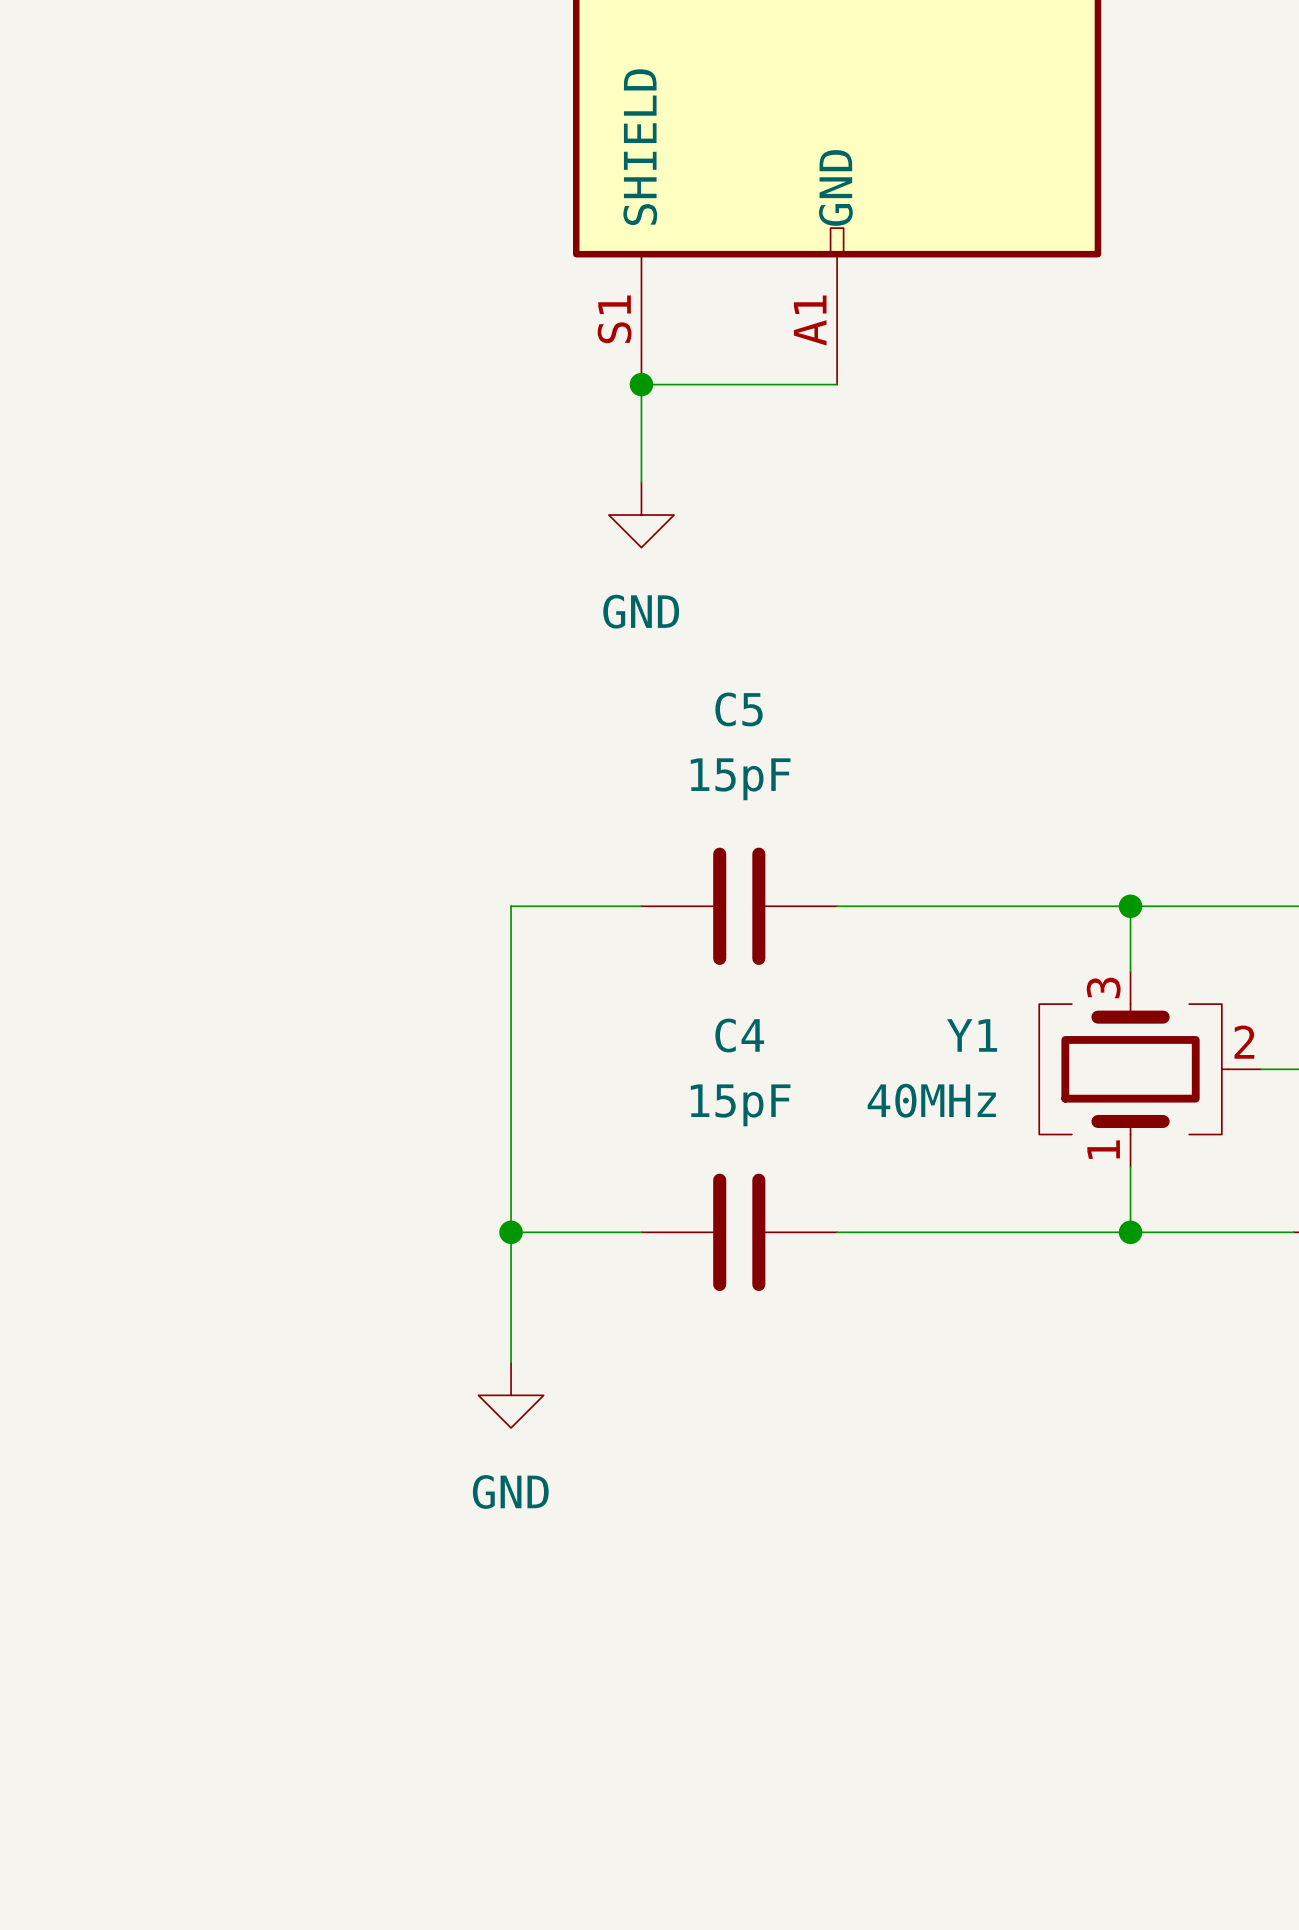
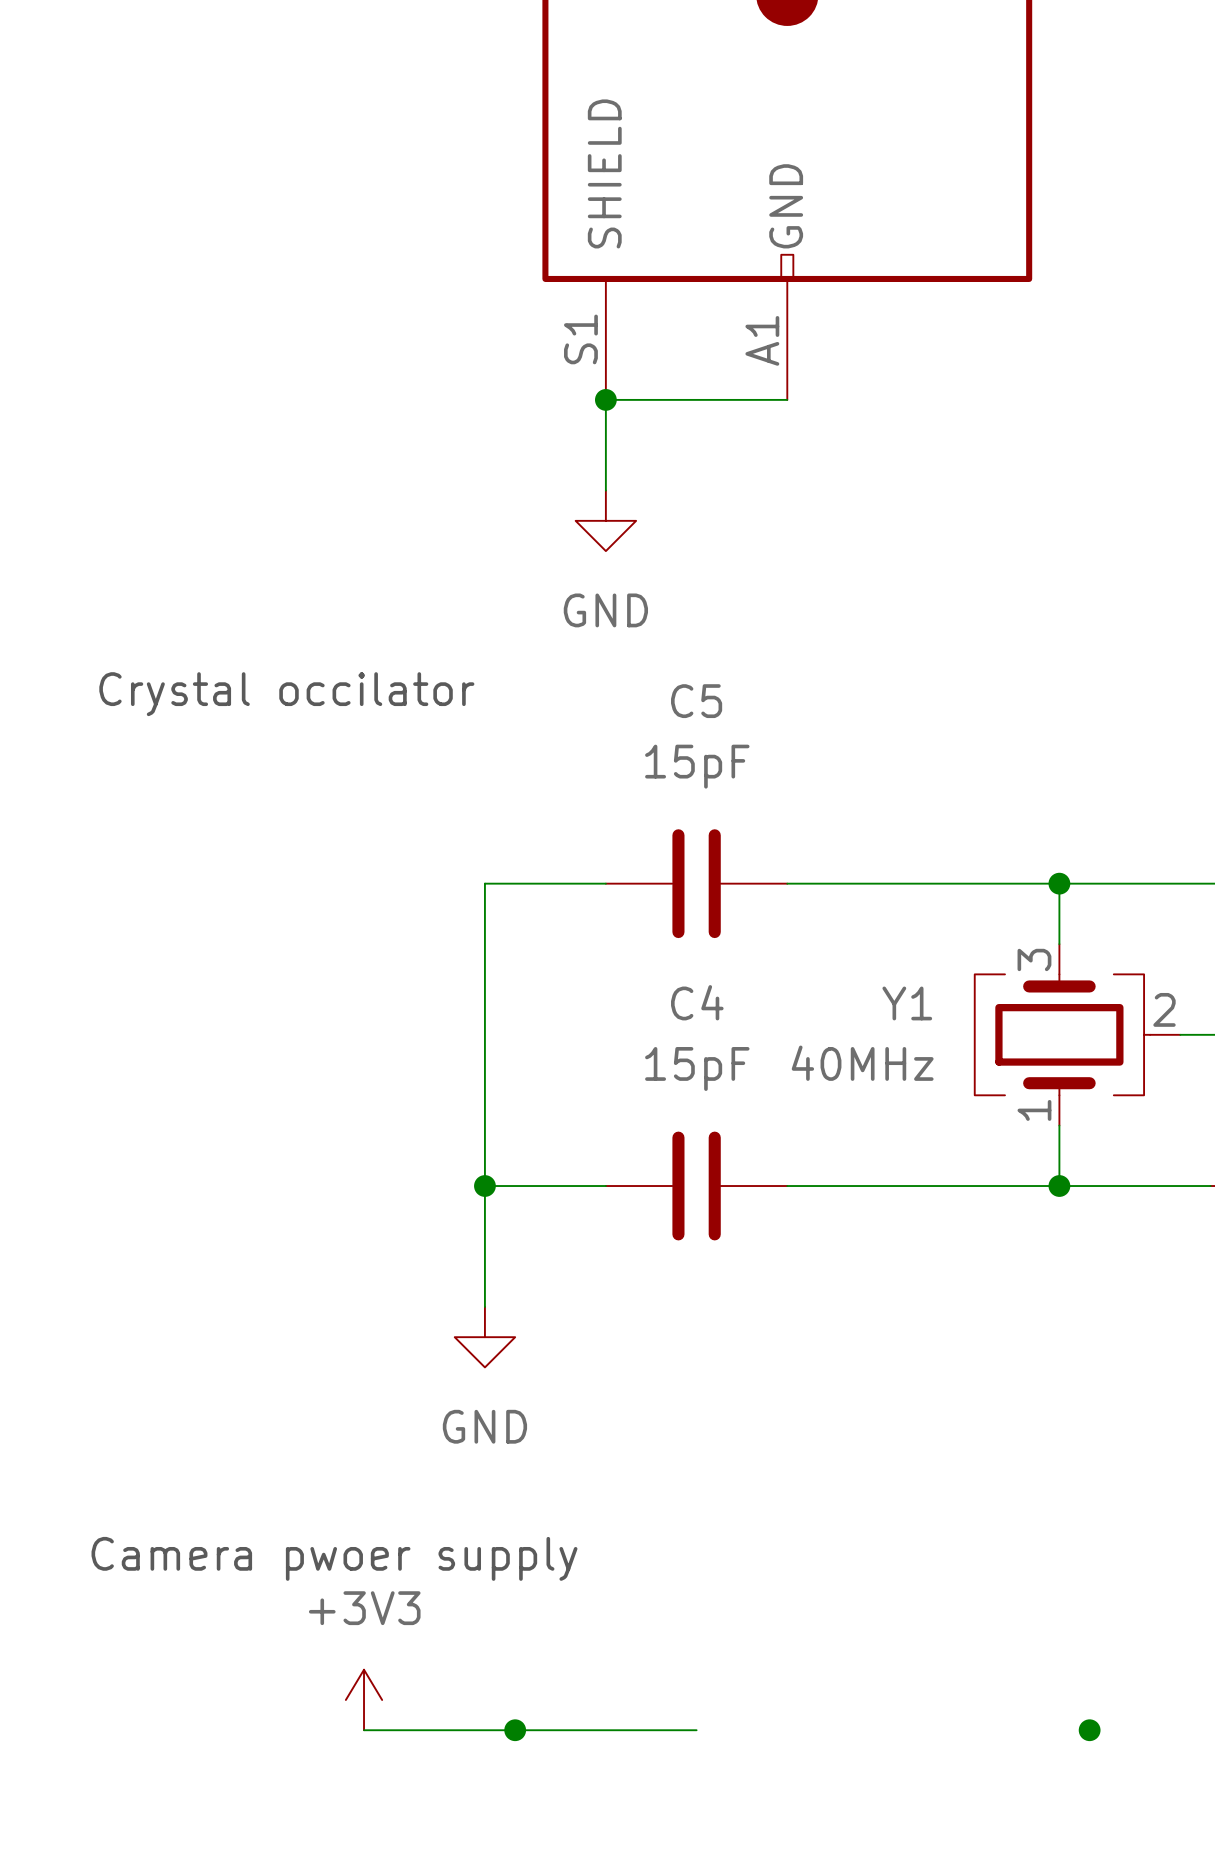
text: none -> Crystal occilator (286, 694)
text: none -> Camera pwoer supply (334, 1558)
power symbol: none -> +3V3 (364, 1699)
wire: none -> (364, 1730) (696, 1730)
junction: none -> (515, 1730)
junction: none -> (1089, 1730)

